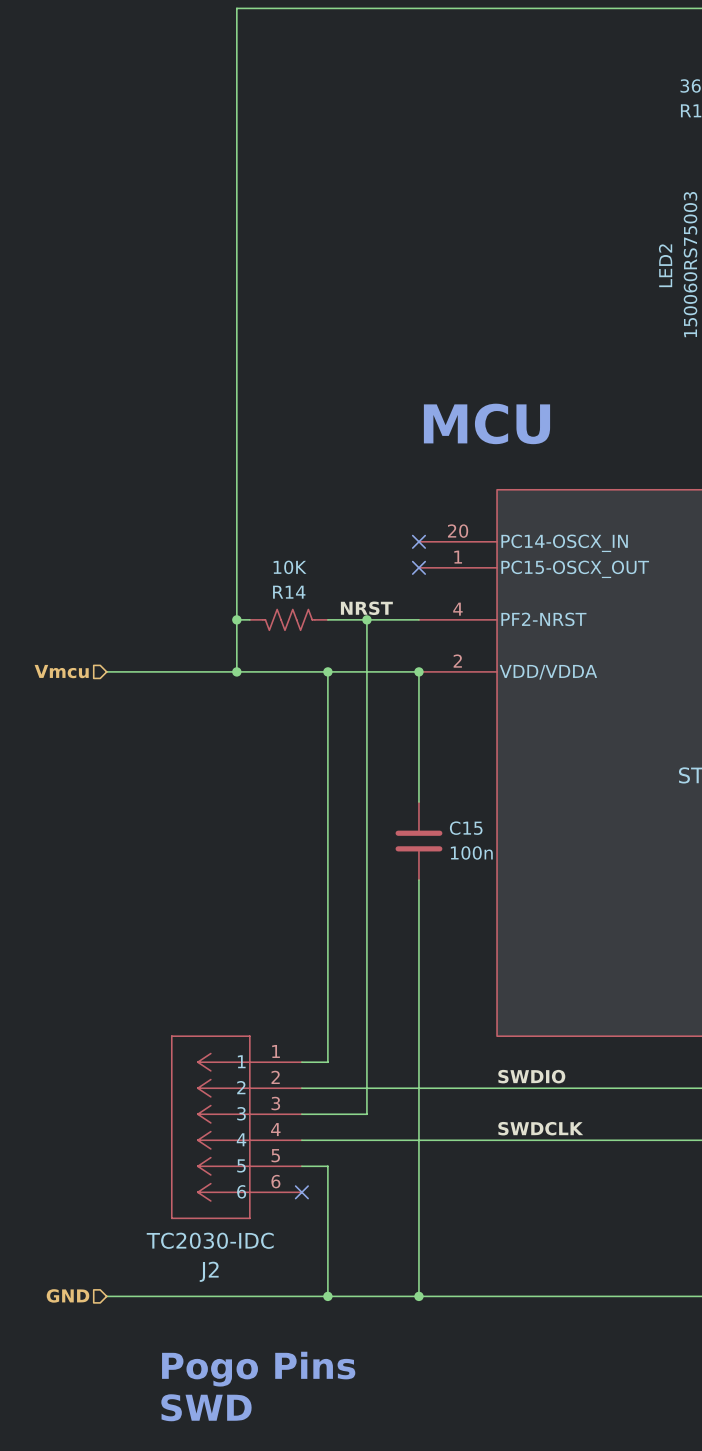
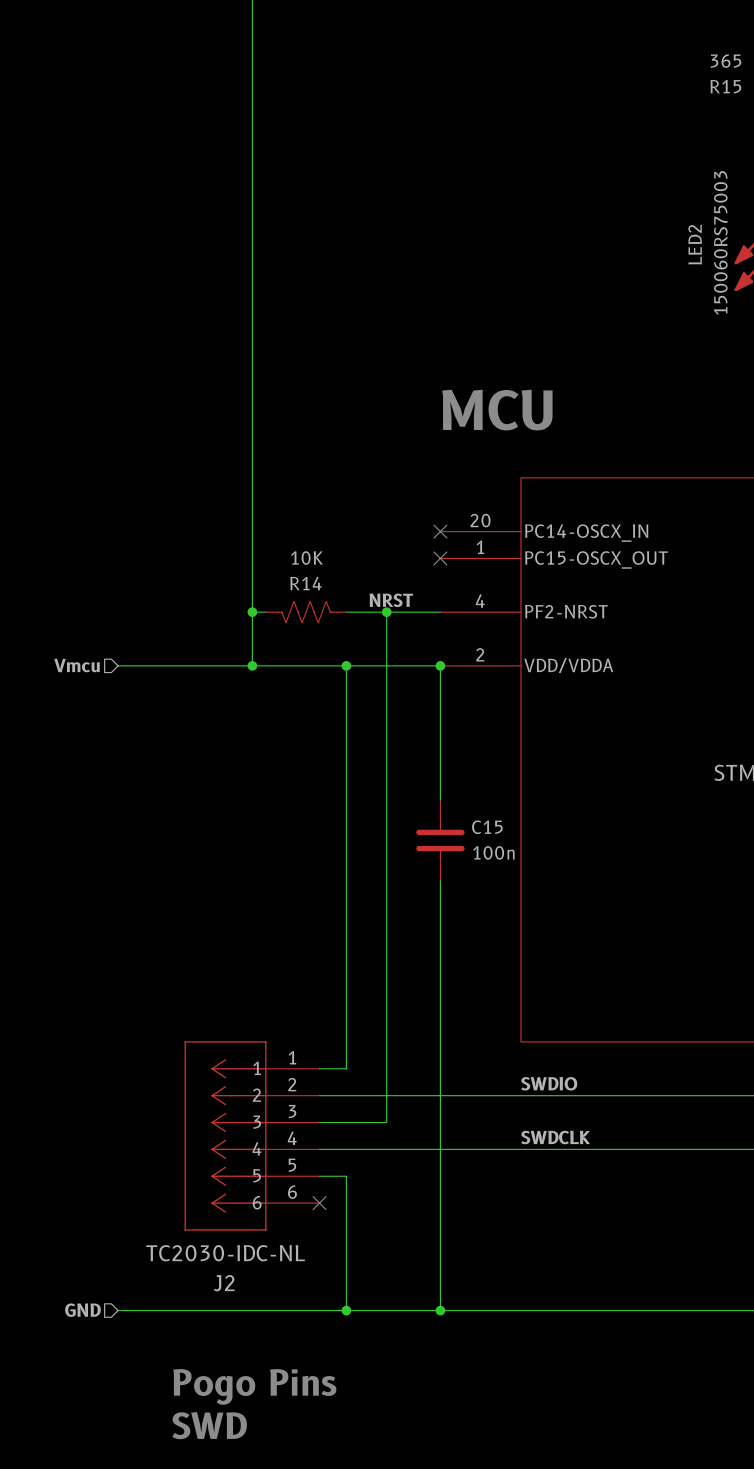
J2 value: TC2030-IDC (210, 1240) -> TC2030-IDC-NL (225, 1253)

